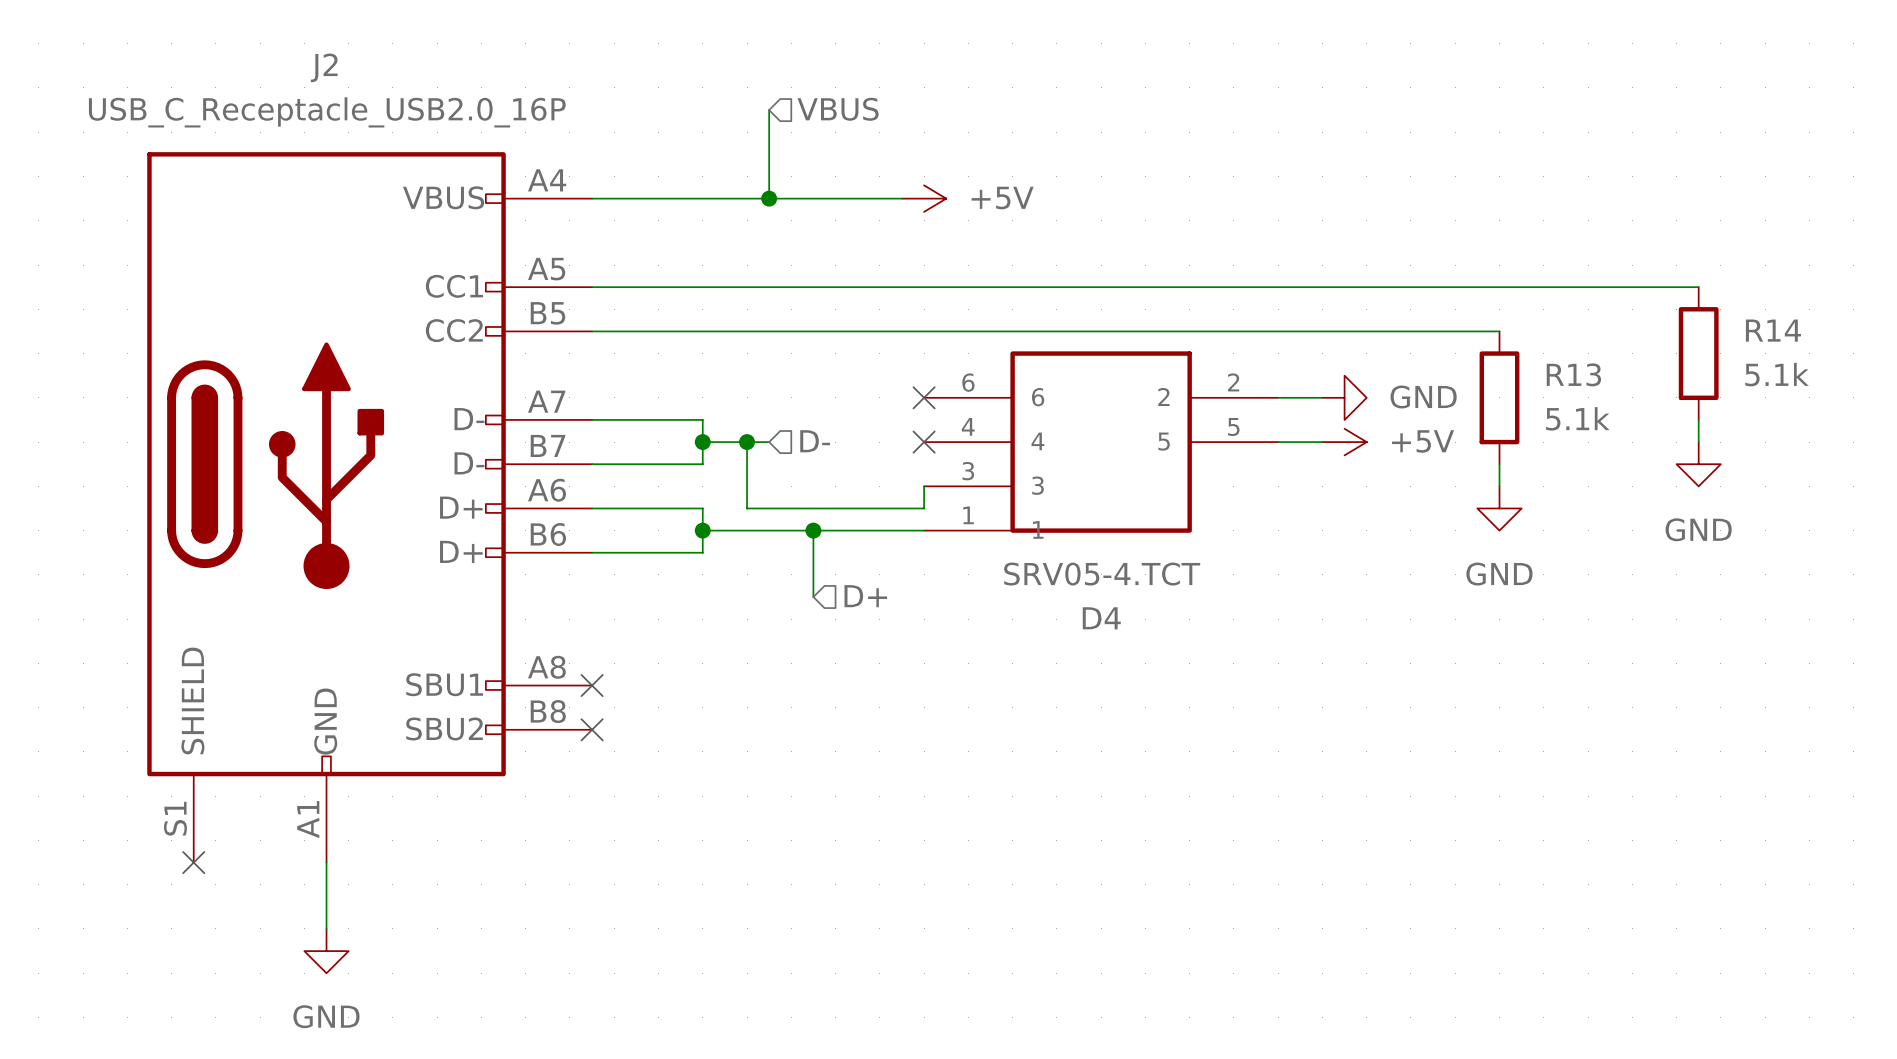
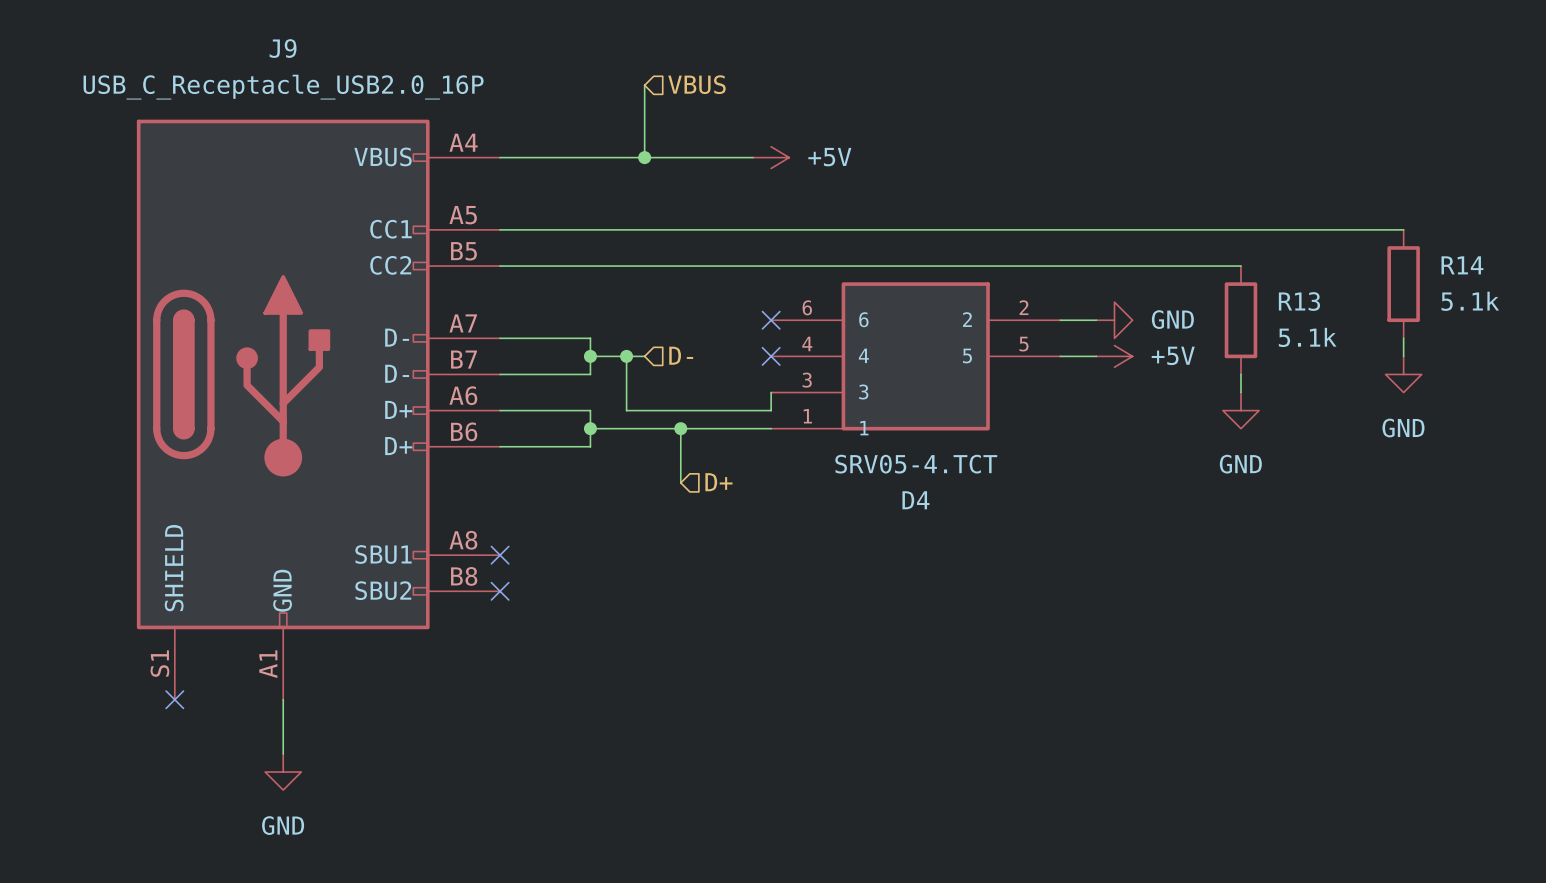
J2 name: J2 (324, 67) -> J9 (283, 48)

